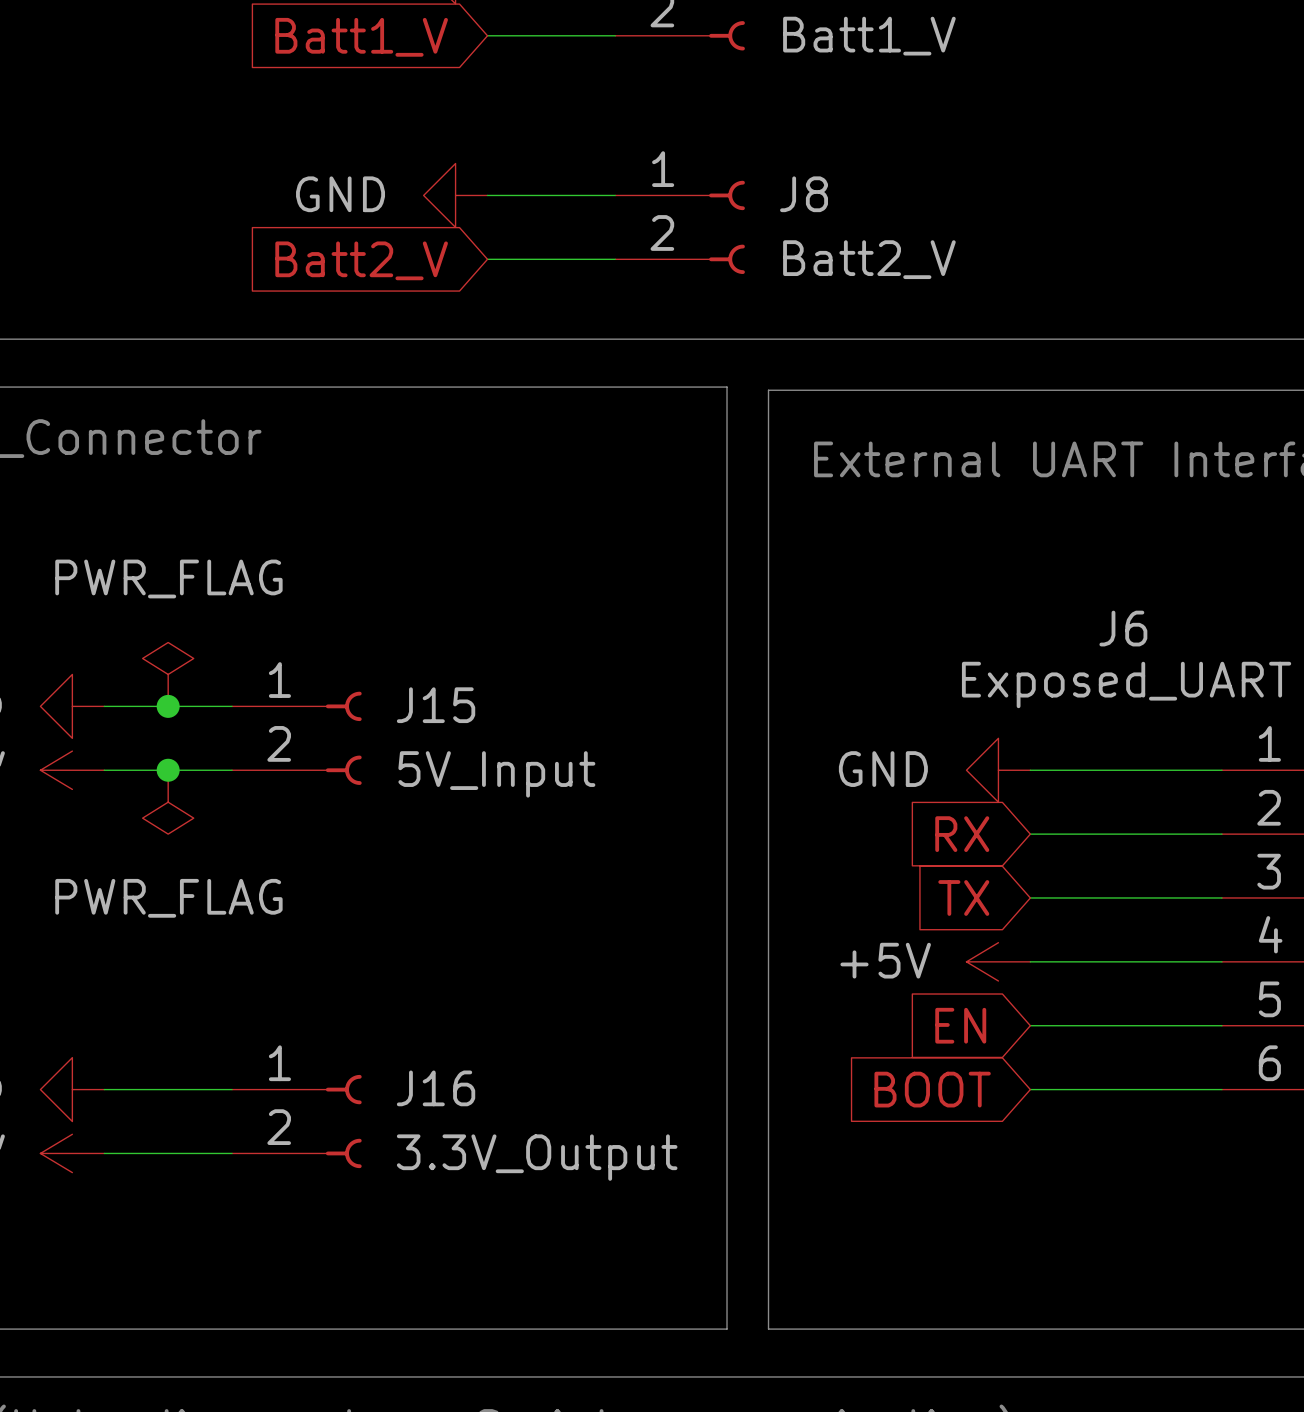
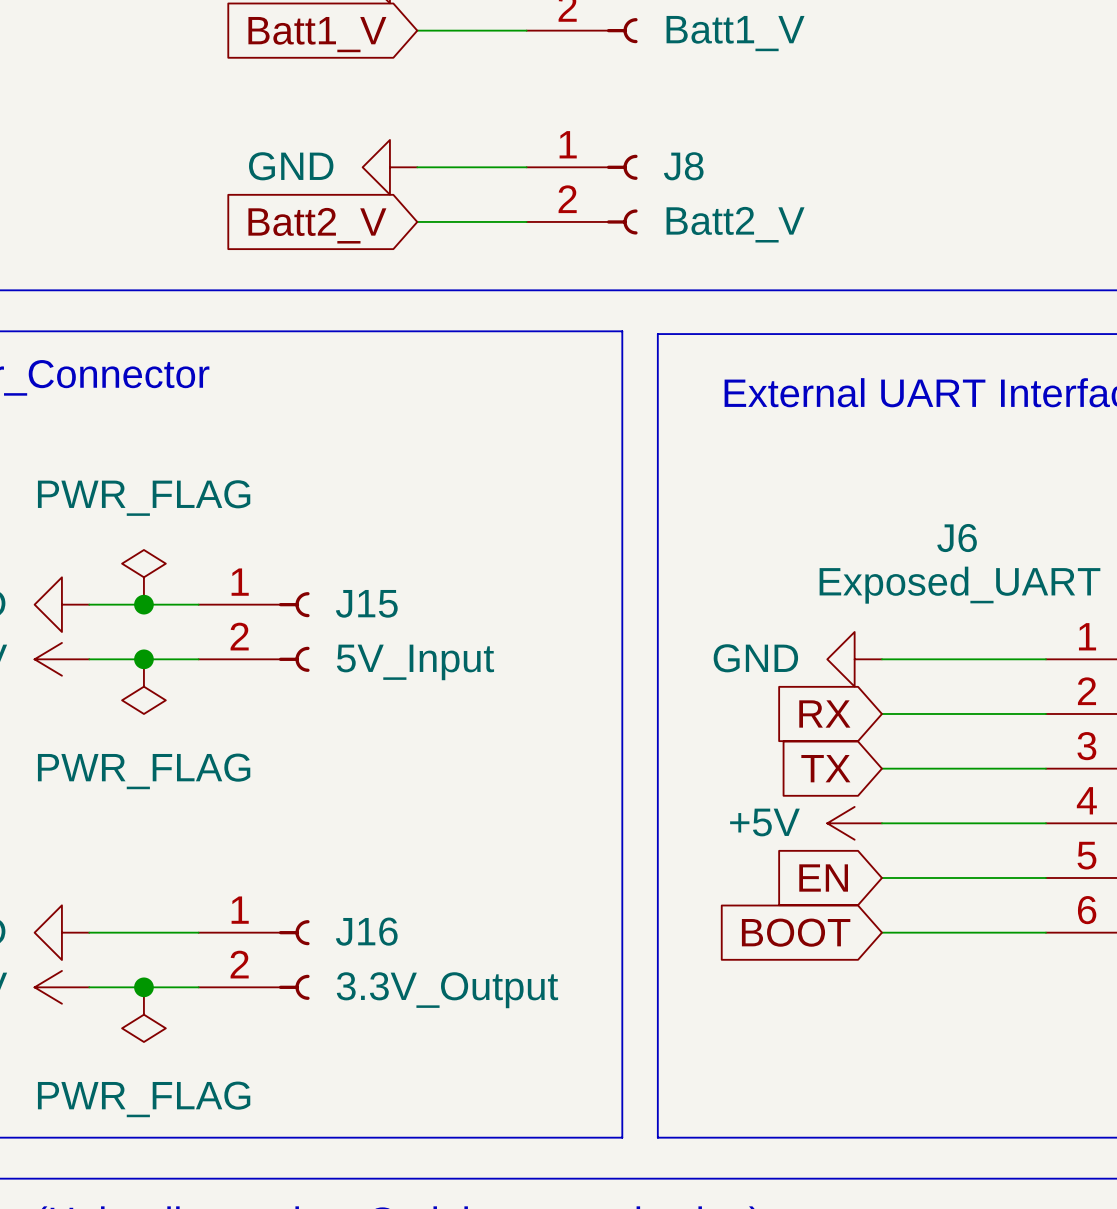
junction: none -> (143, 987)
power symbol: none -> PWR_FLAG (143, 1014)

